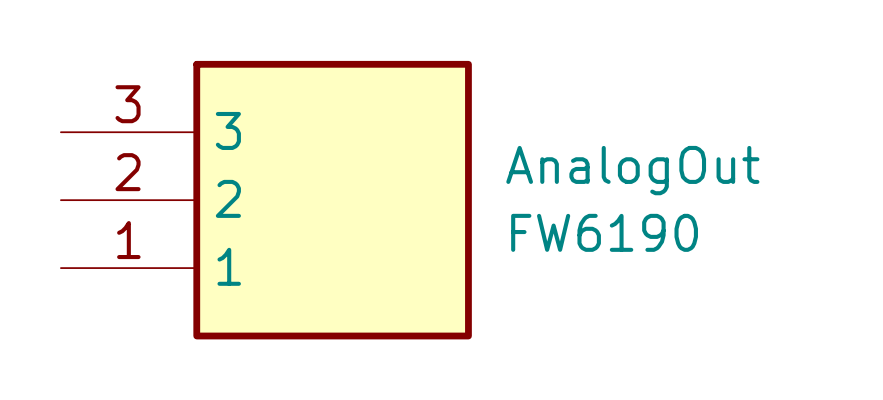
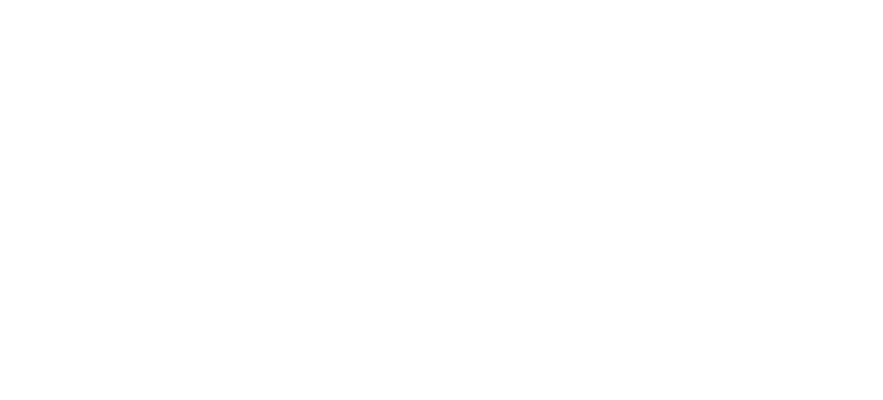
AnalogOut: FW6190 (266, 200) -> none

